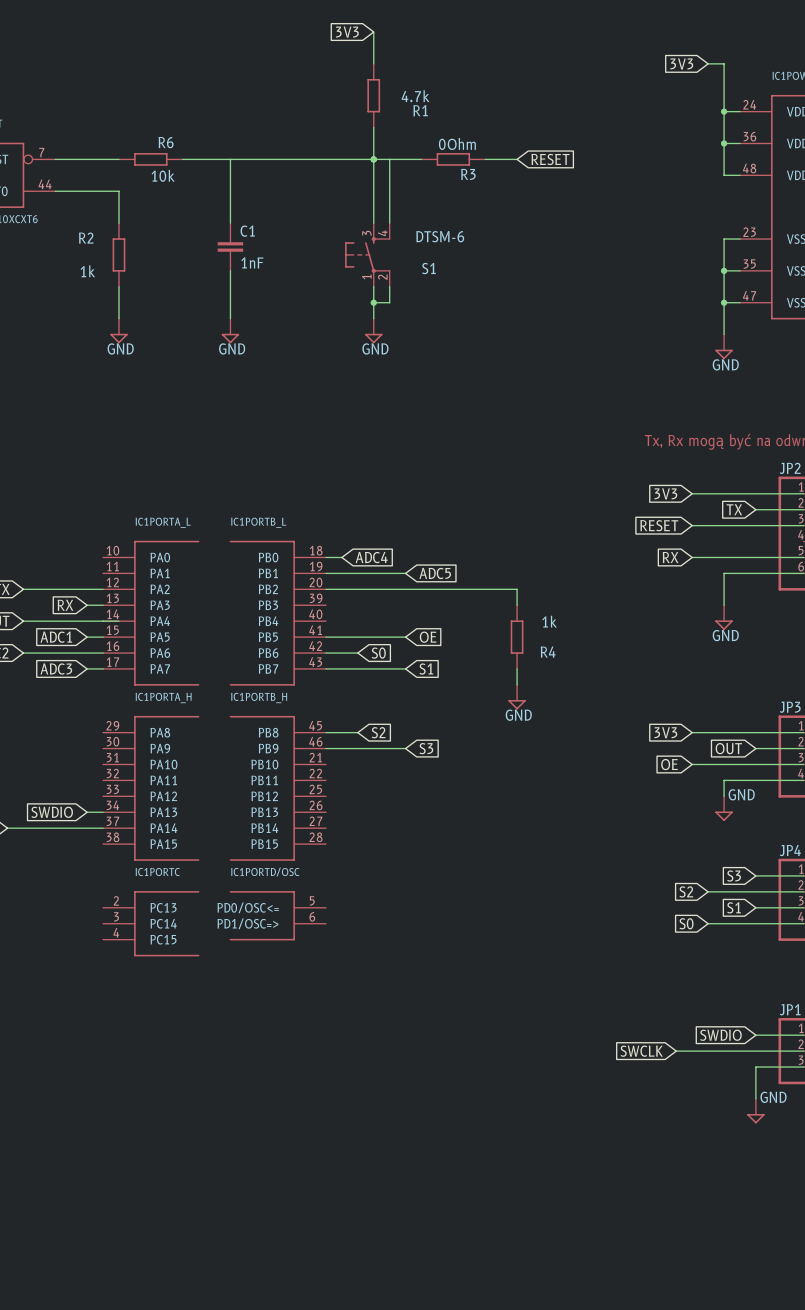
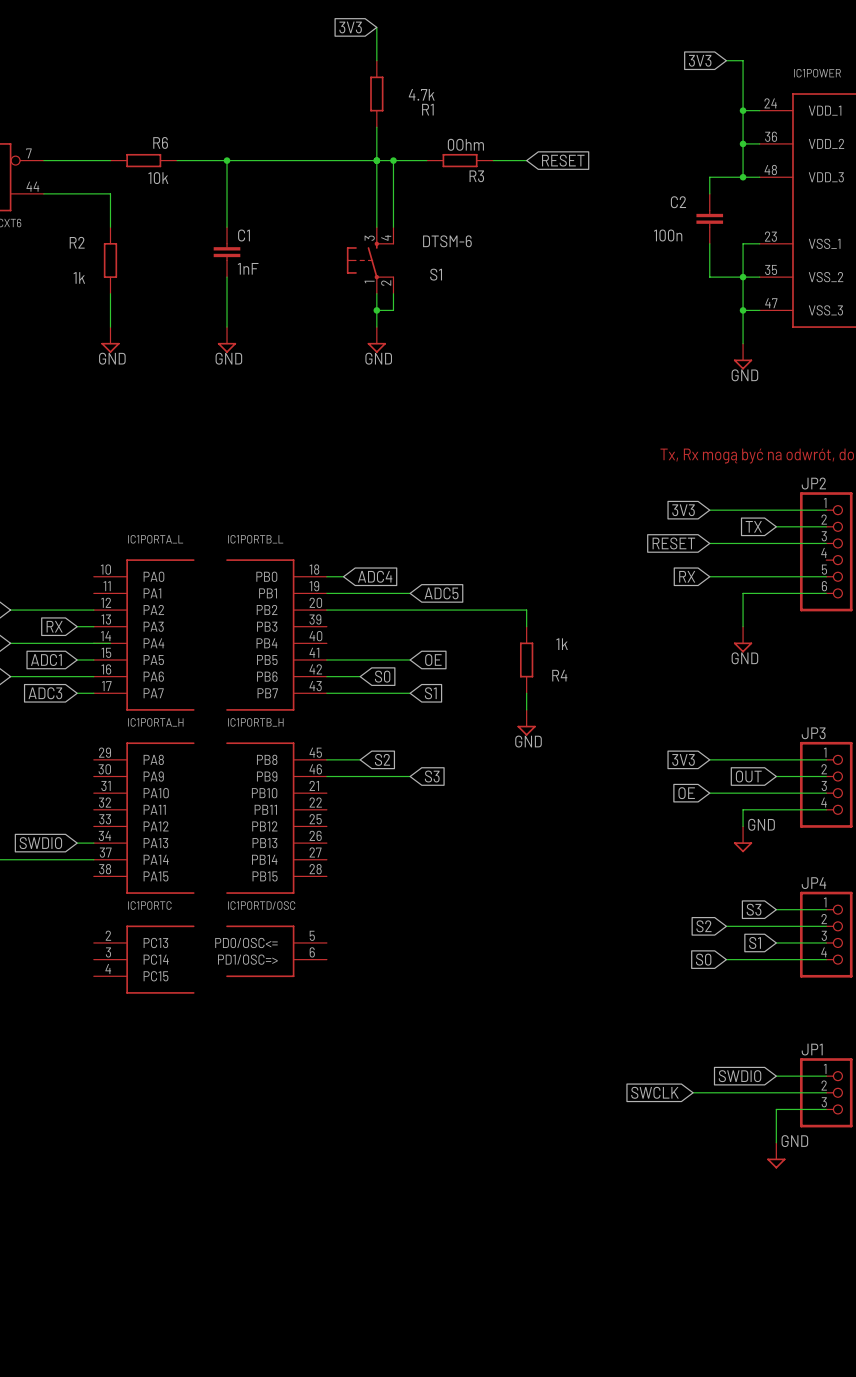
junction: none -> (227, 160)
junction: none -> (393, 160)
wire: none -> (743, 177) (709, 177) (709, 193)
junction: none -> (743, 177)
C2: none -> 100n (709, 218)
wire: none -> (709, 243) (709, 277) (743, 277)

